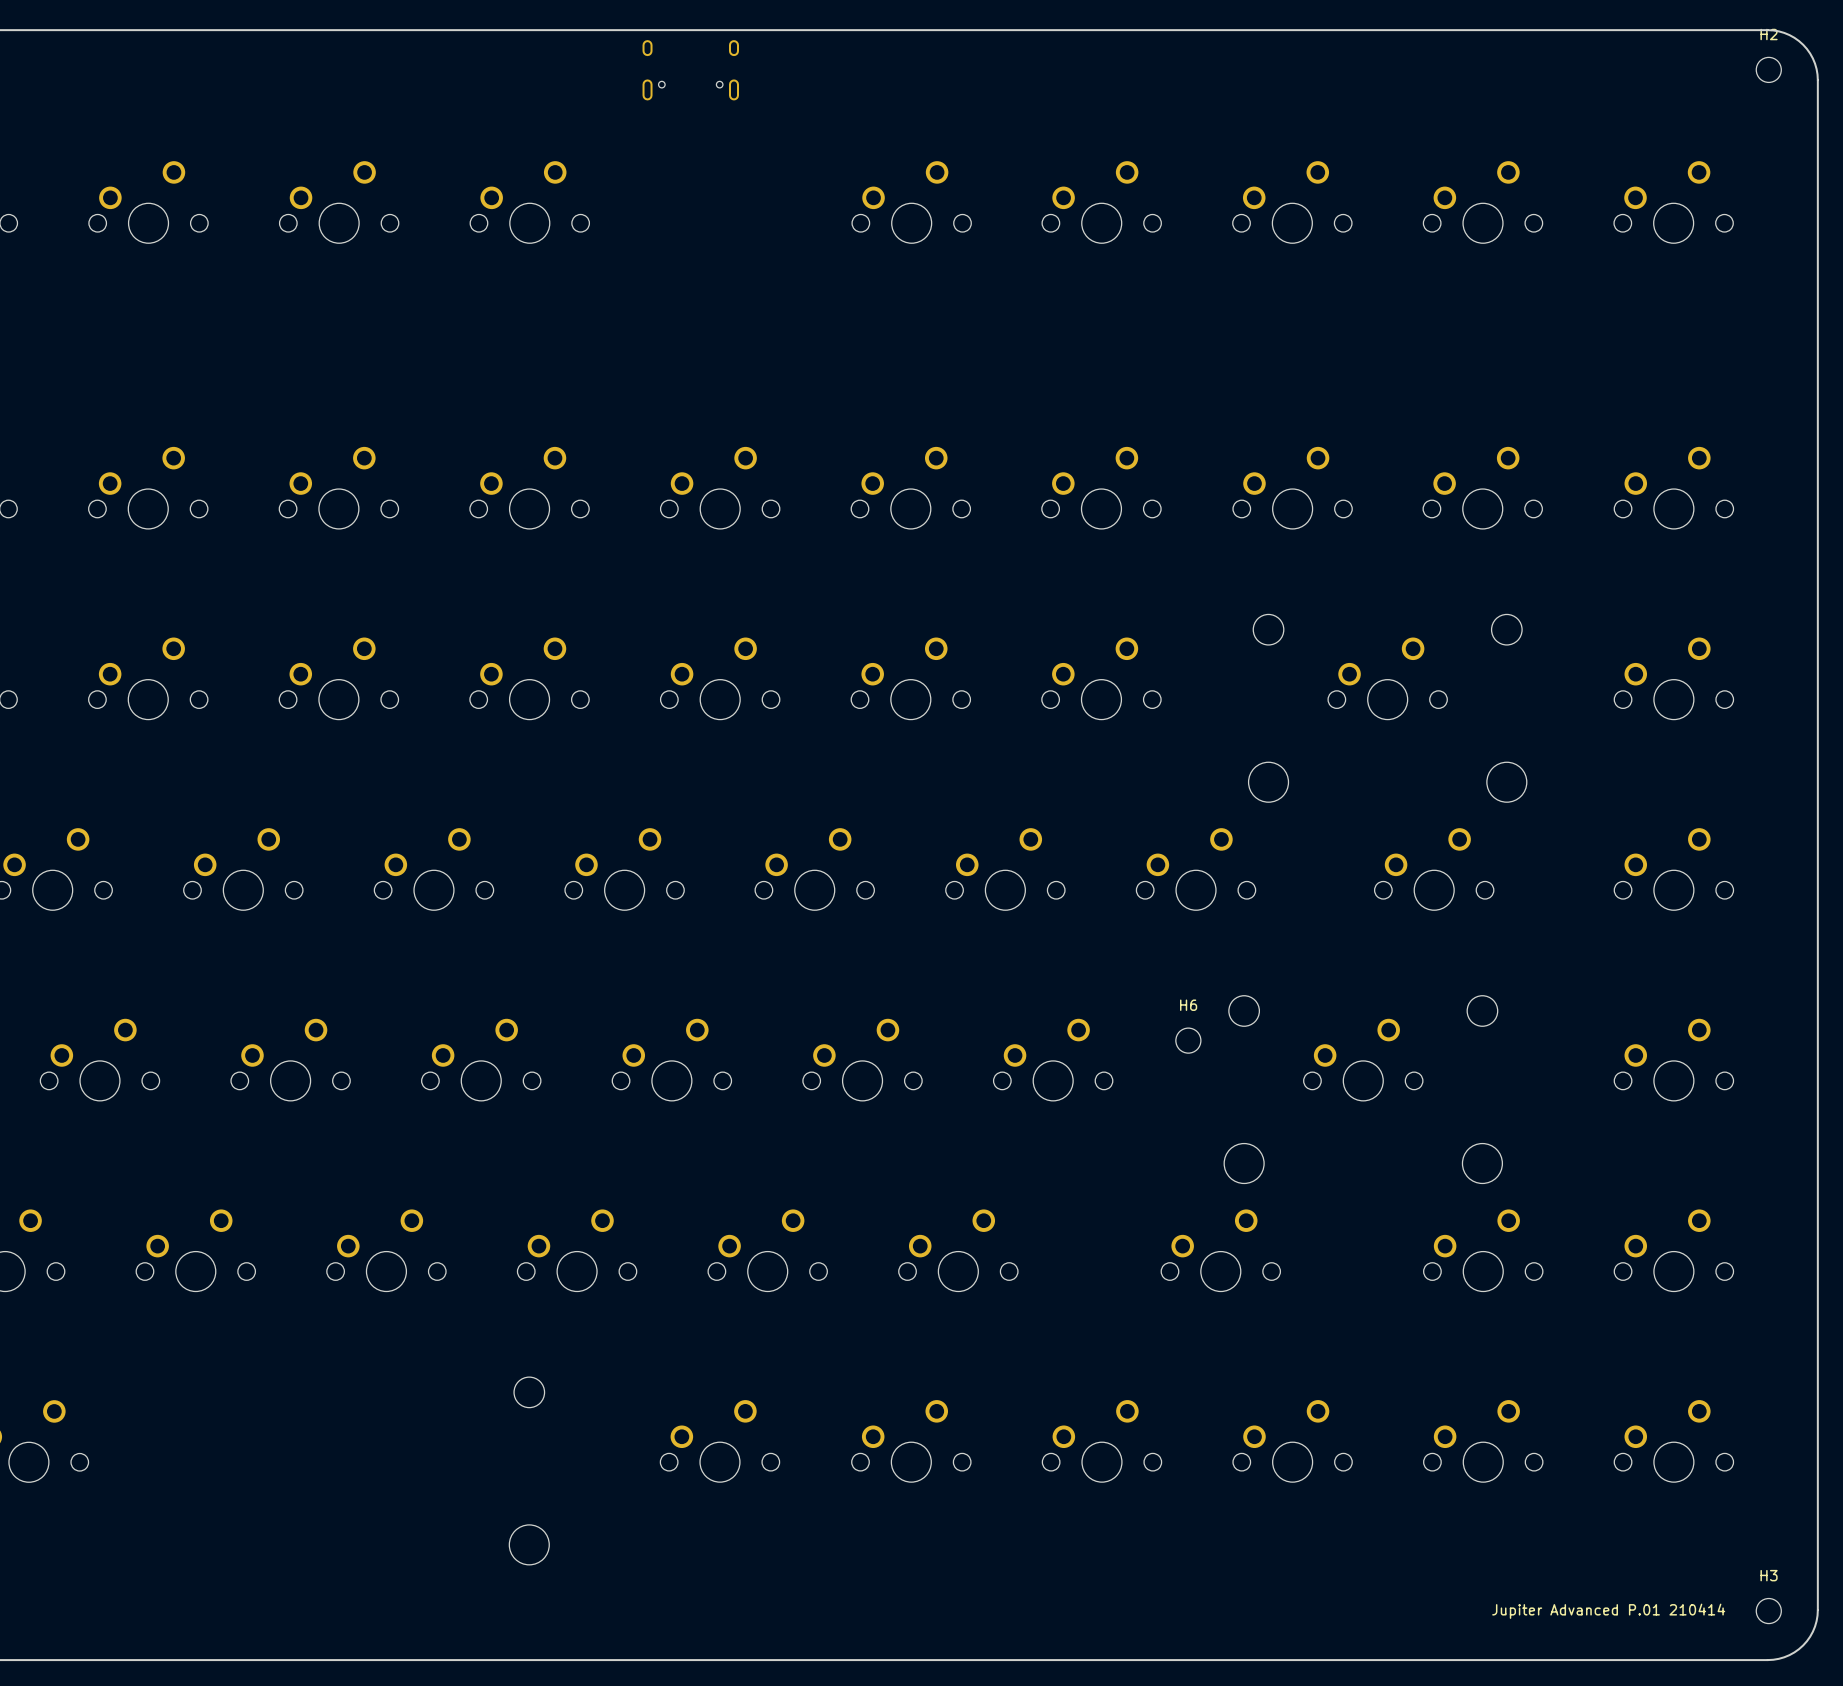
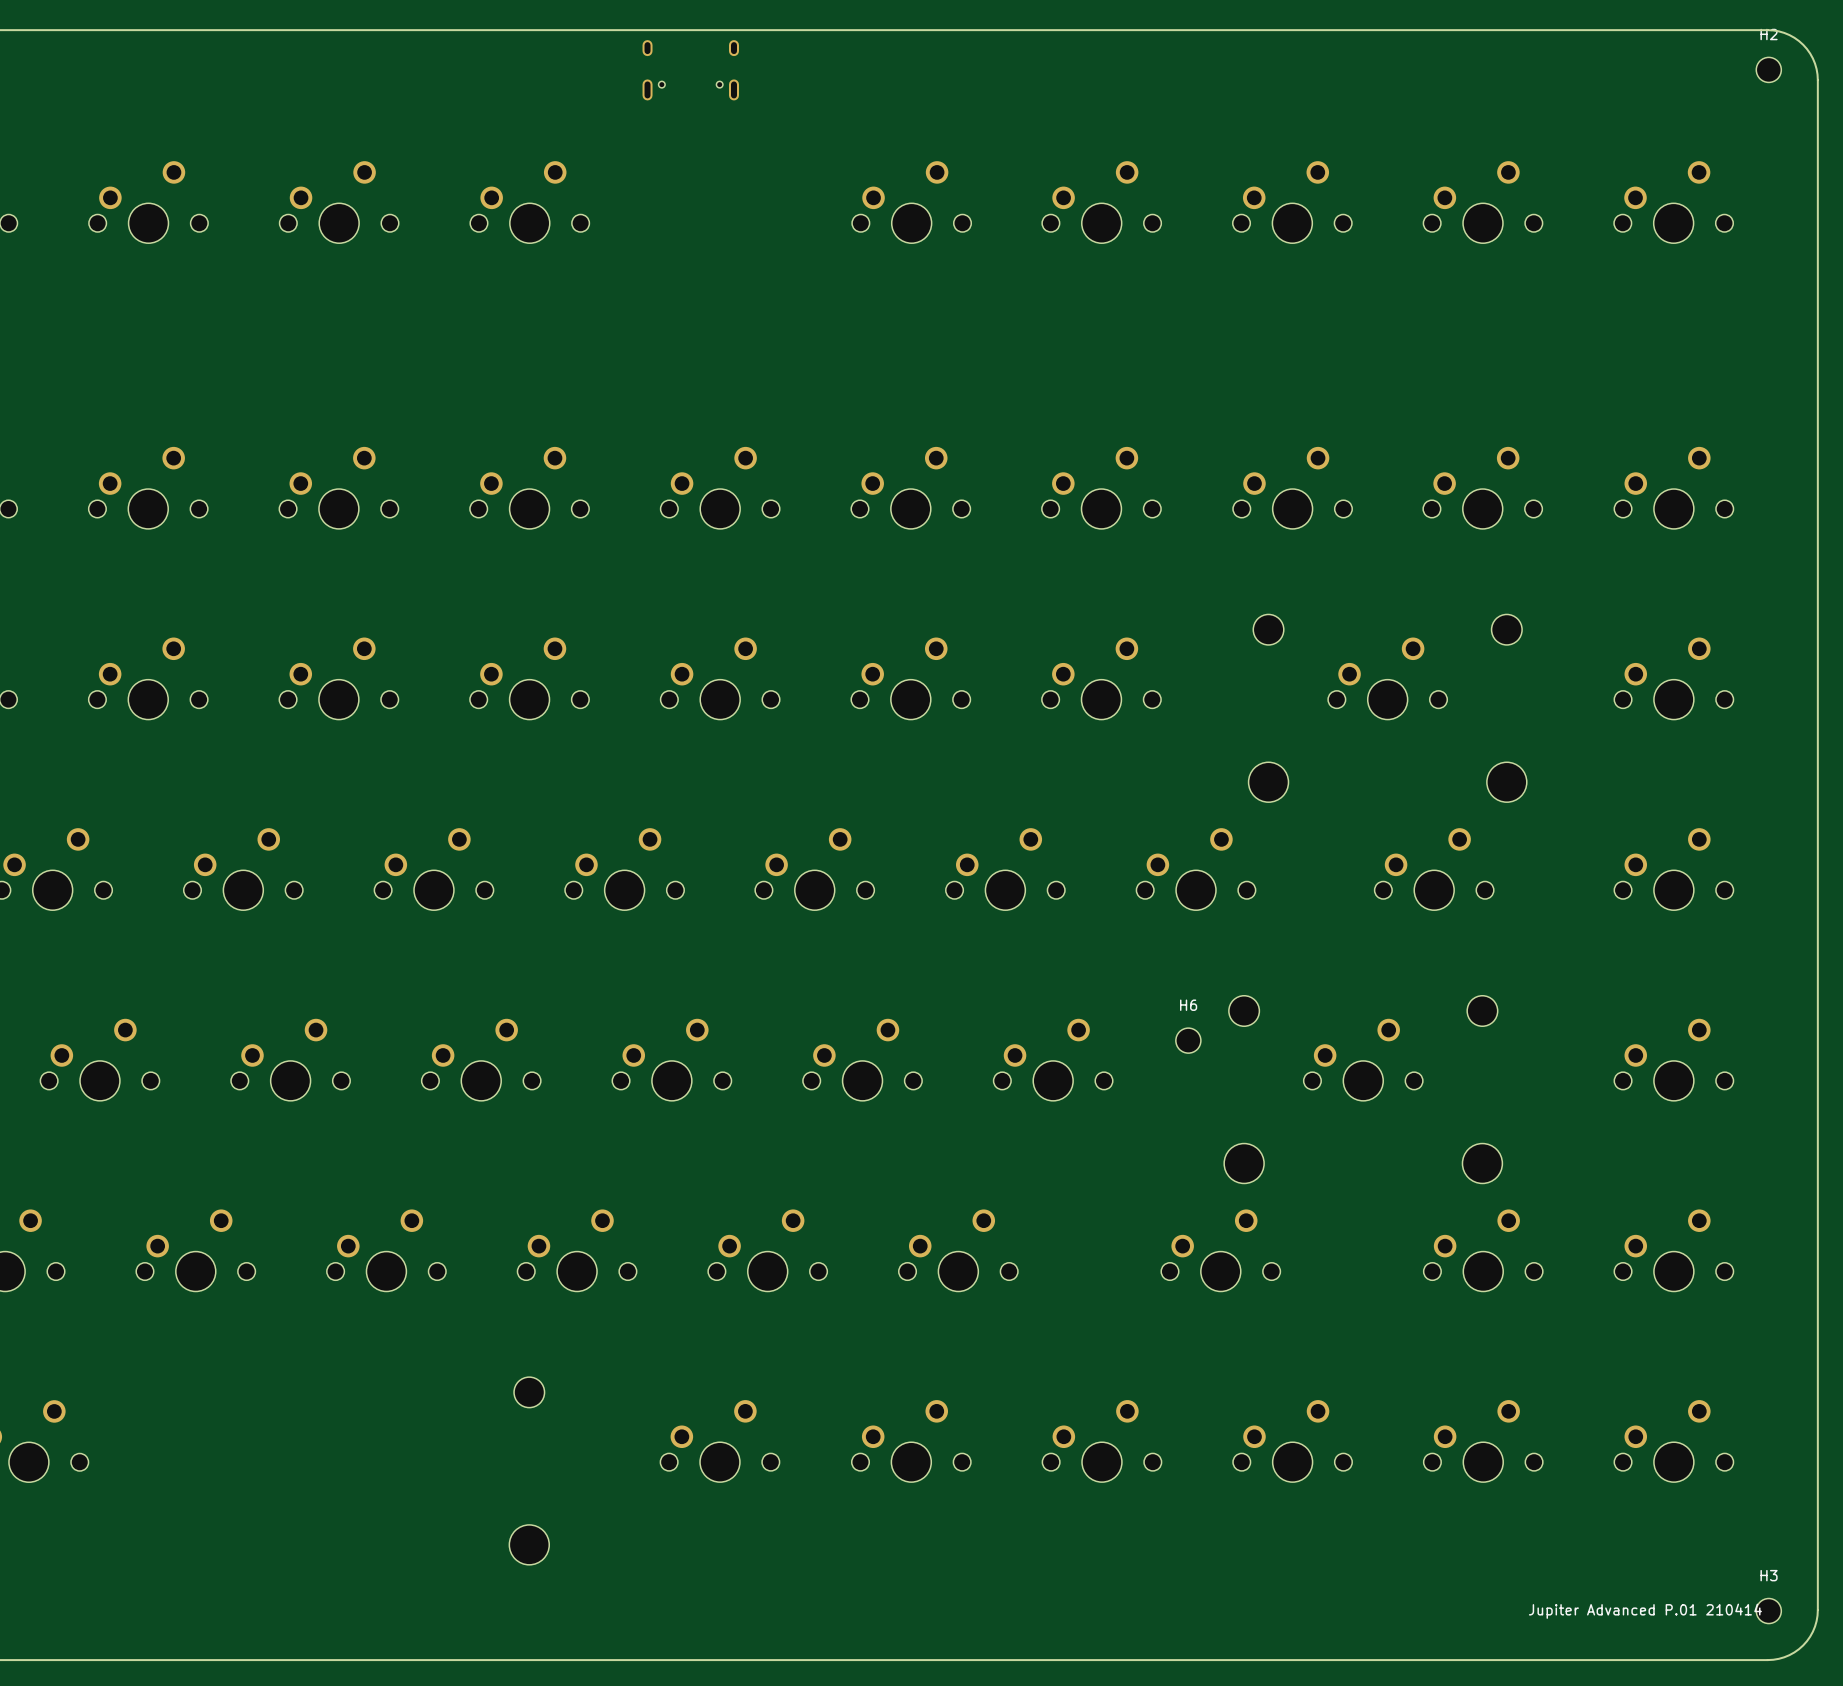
text position: Jupiter Advanced P.01 210414 (1608, 1611) -> Jupiter Advanced P.01 210414 (1645, 1611)

